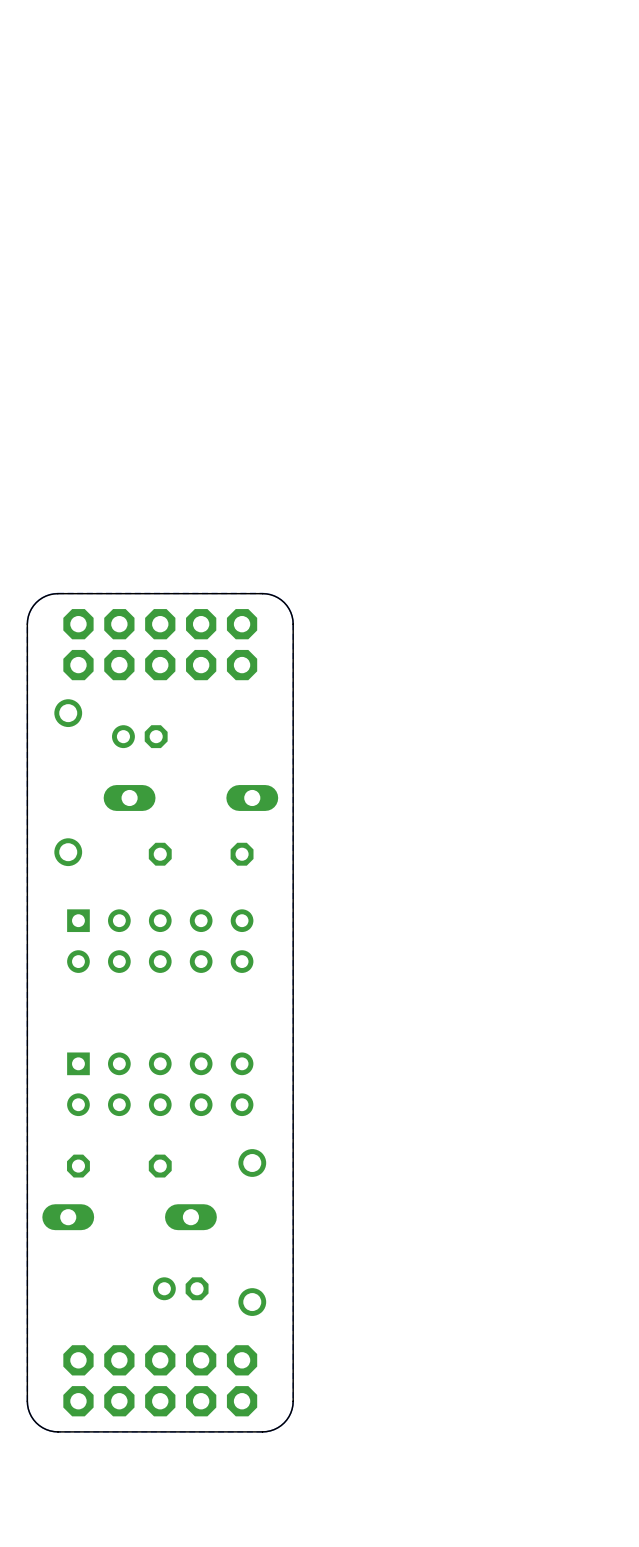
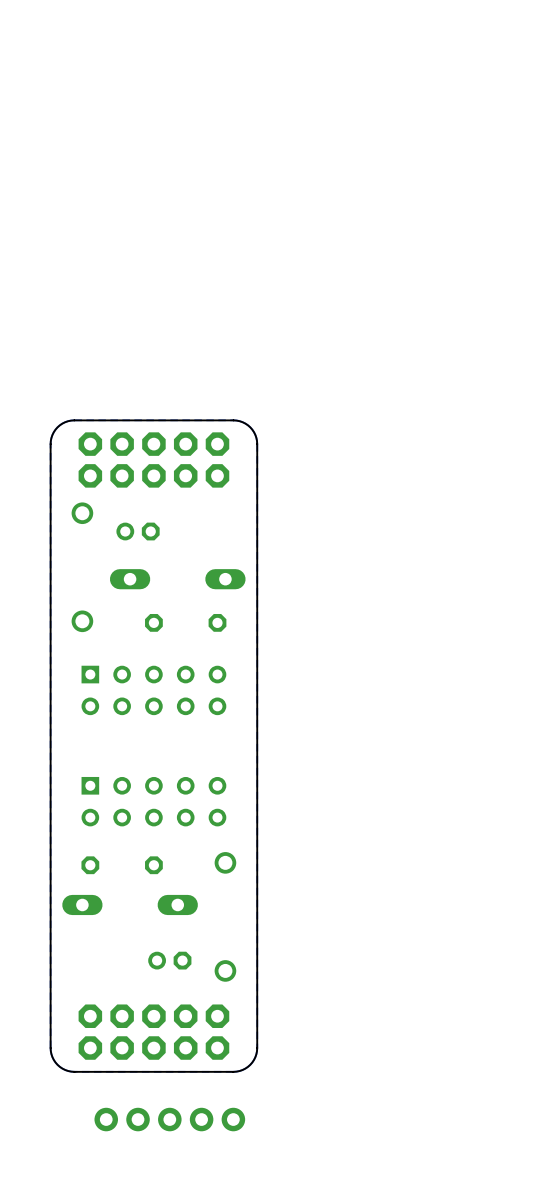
part: none -> (169, 1119)

